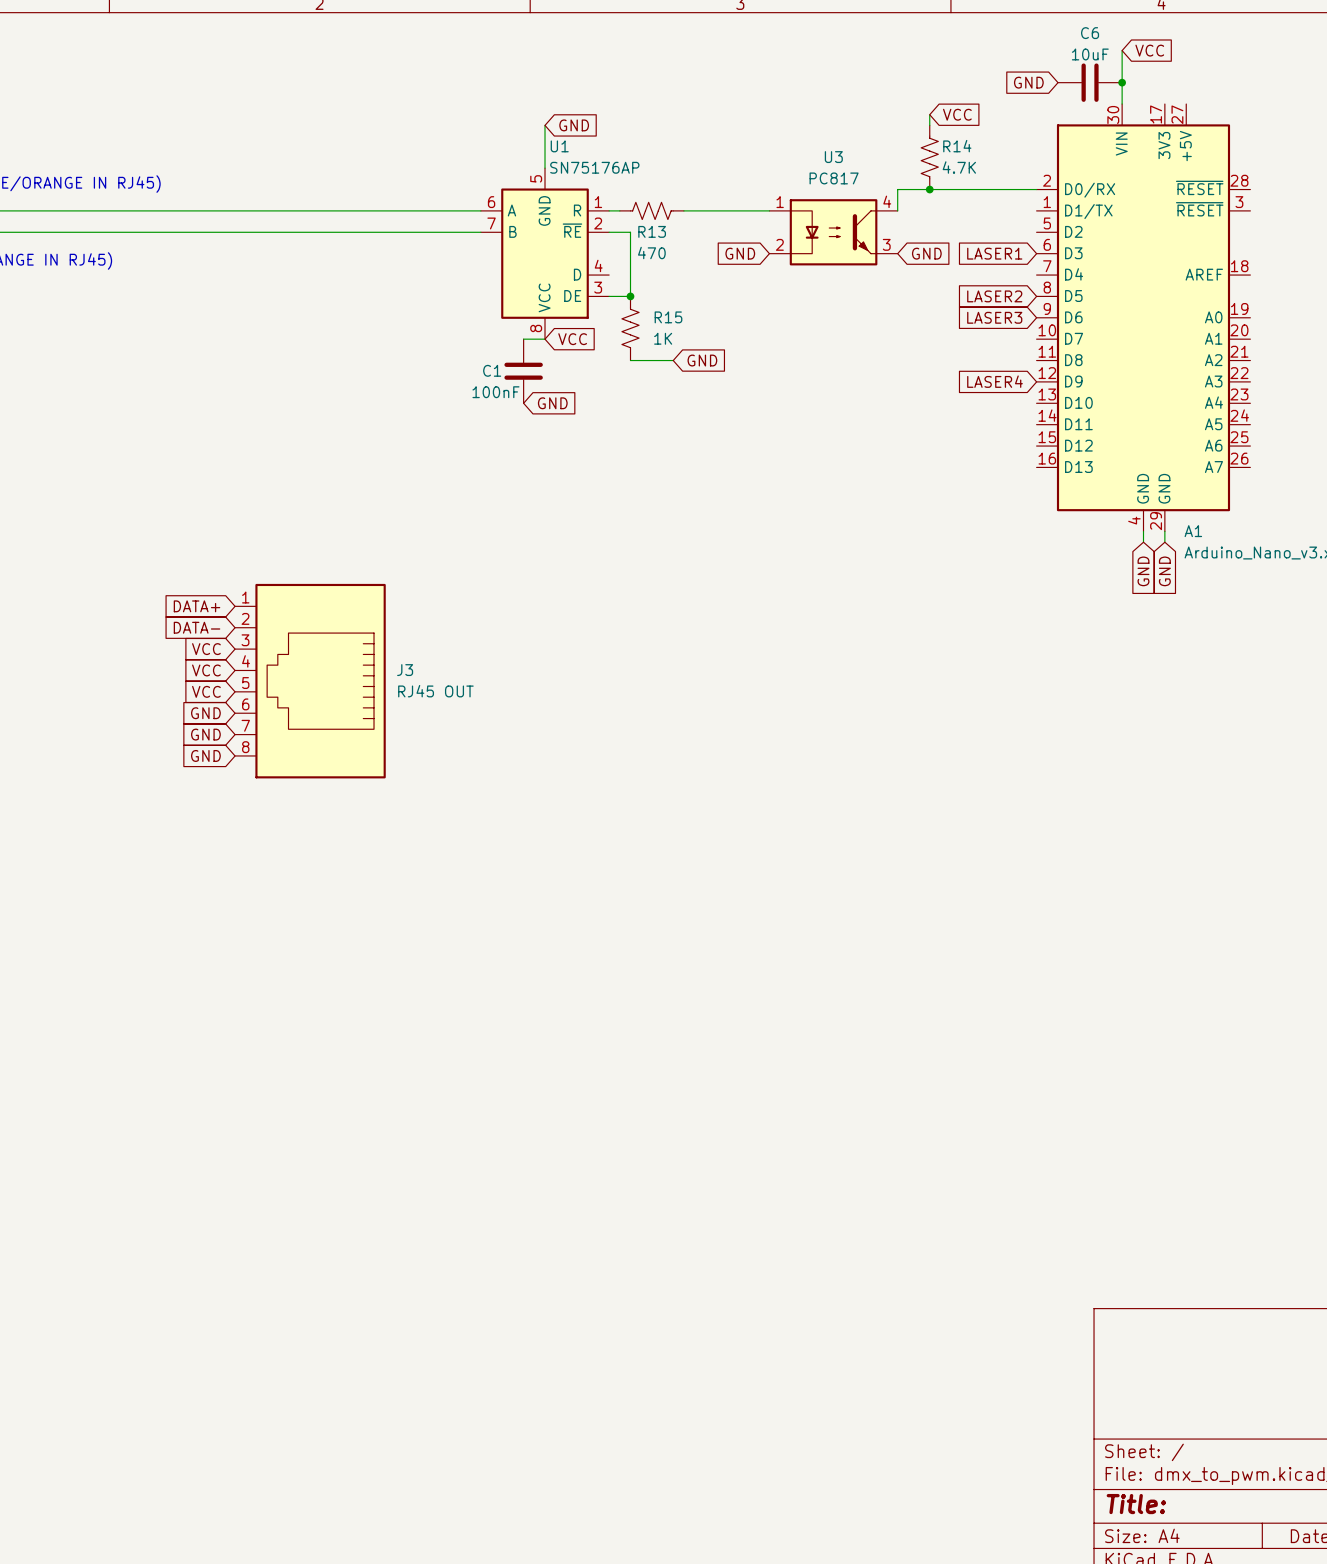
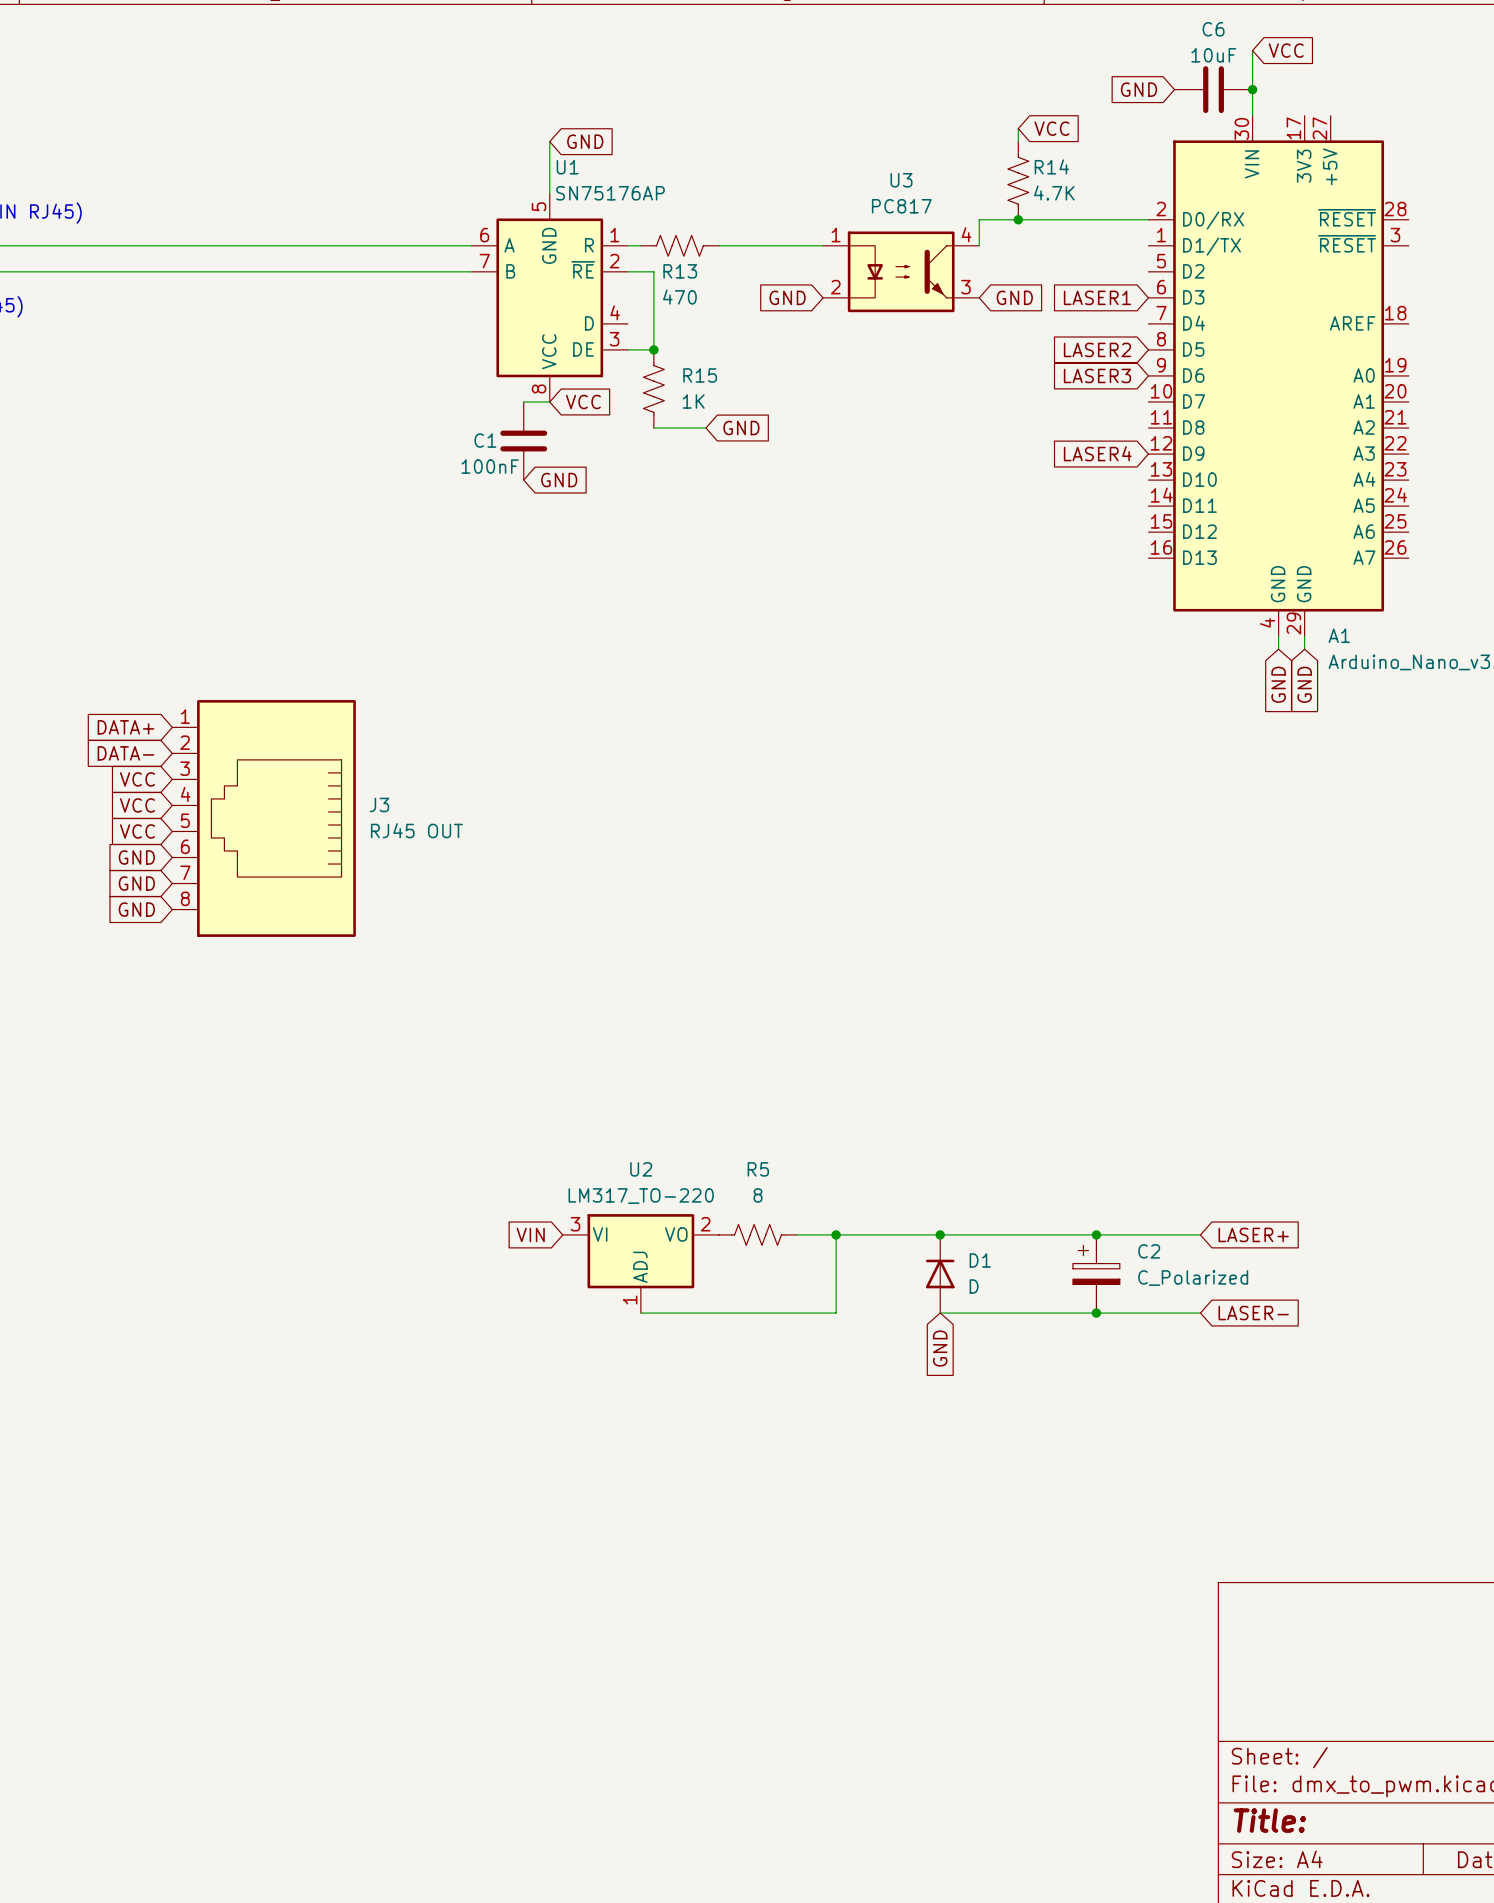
global label: none -> VIN (530, 1234)
R5: none -> 8 (758, 1234)
wire: none -> (797, 1234) (1200, 1234)
wire: none -> (836, 1234) (836, 1313) (640, 1313)
junction: none -> (836, 1234)
junction: none -> (940, 1234)
junction: none -> (1096, 1234)
global label: none -> LASER+ (1253, 1234)
U2: none -> LM317_TO-220 (640, 1263)
D1: none -> D (940, 1273)
C2: none -> C_Polarized (1096, 1273)
wire: none -> (940, 1313) (1200, 1313)
junction: none -> (1096, 1313)
global label: none -> LASER- (1253, 1313)
global label: none -> GND (940, 1348)

